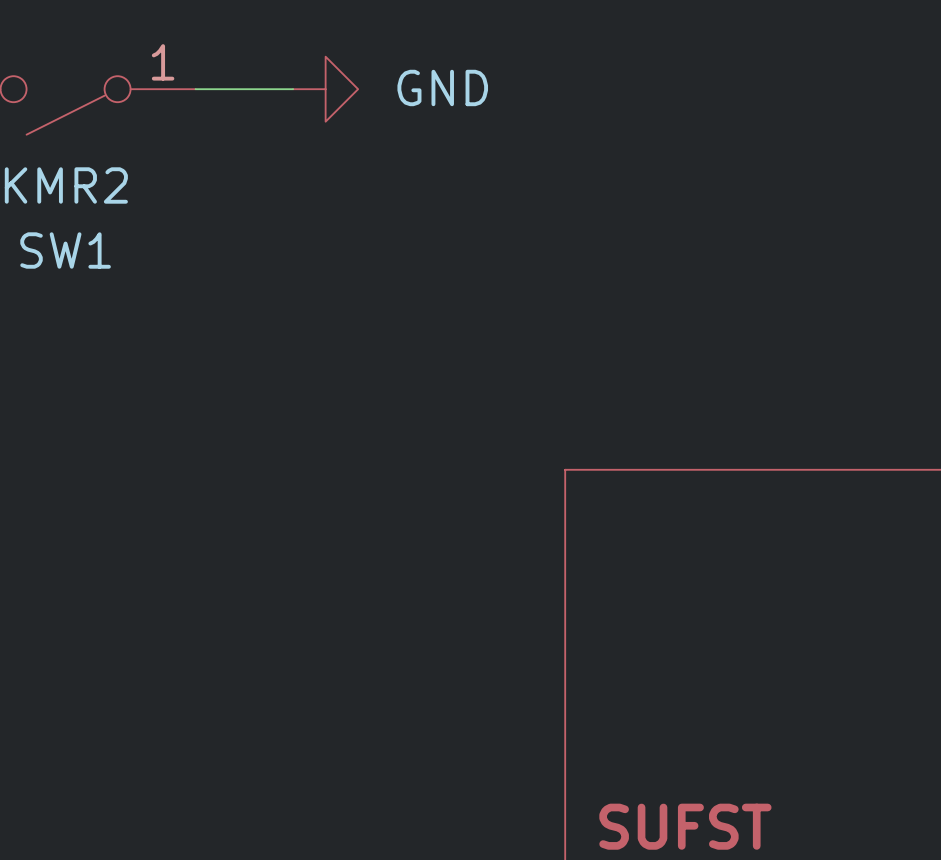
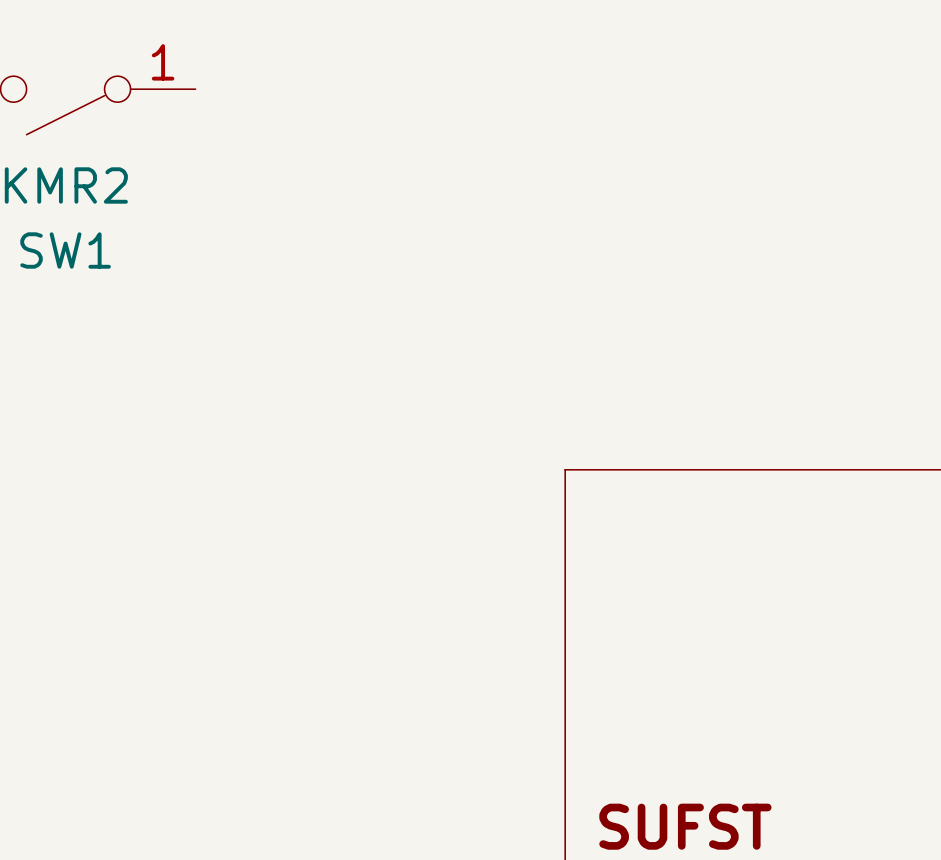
wire: (195, 89) (293, 89) -> none
power symbol: GND (325, 89) -> none

